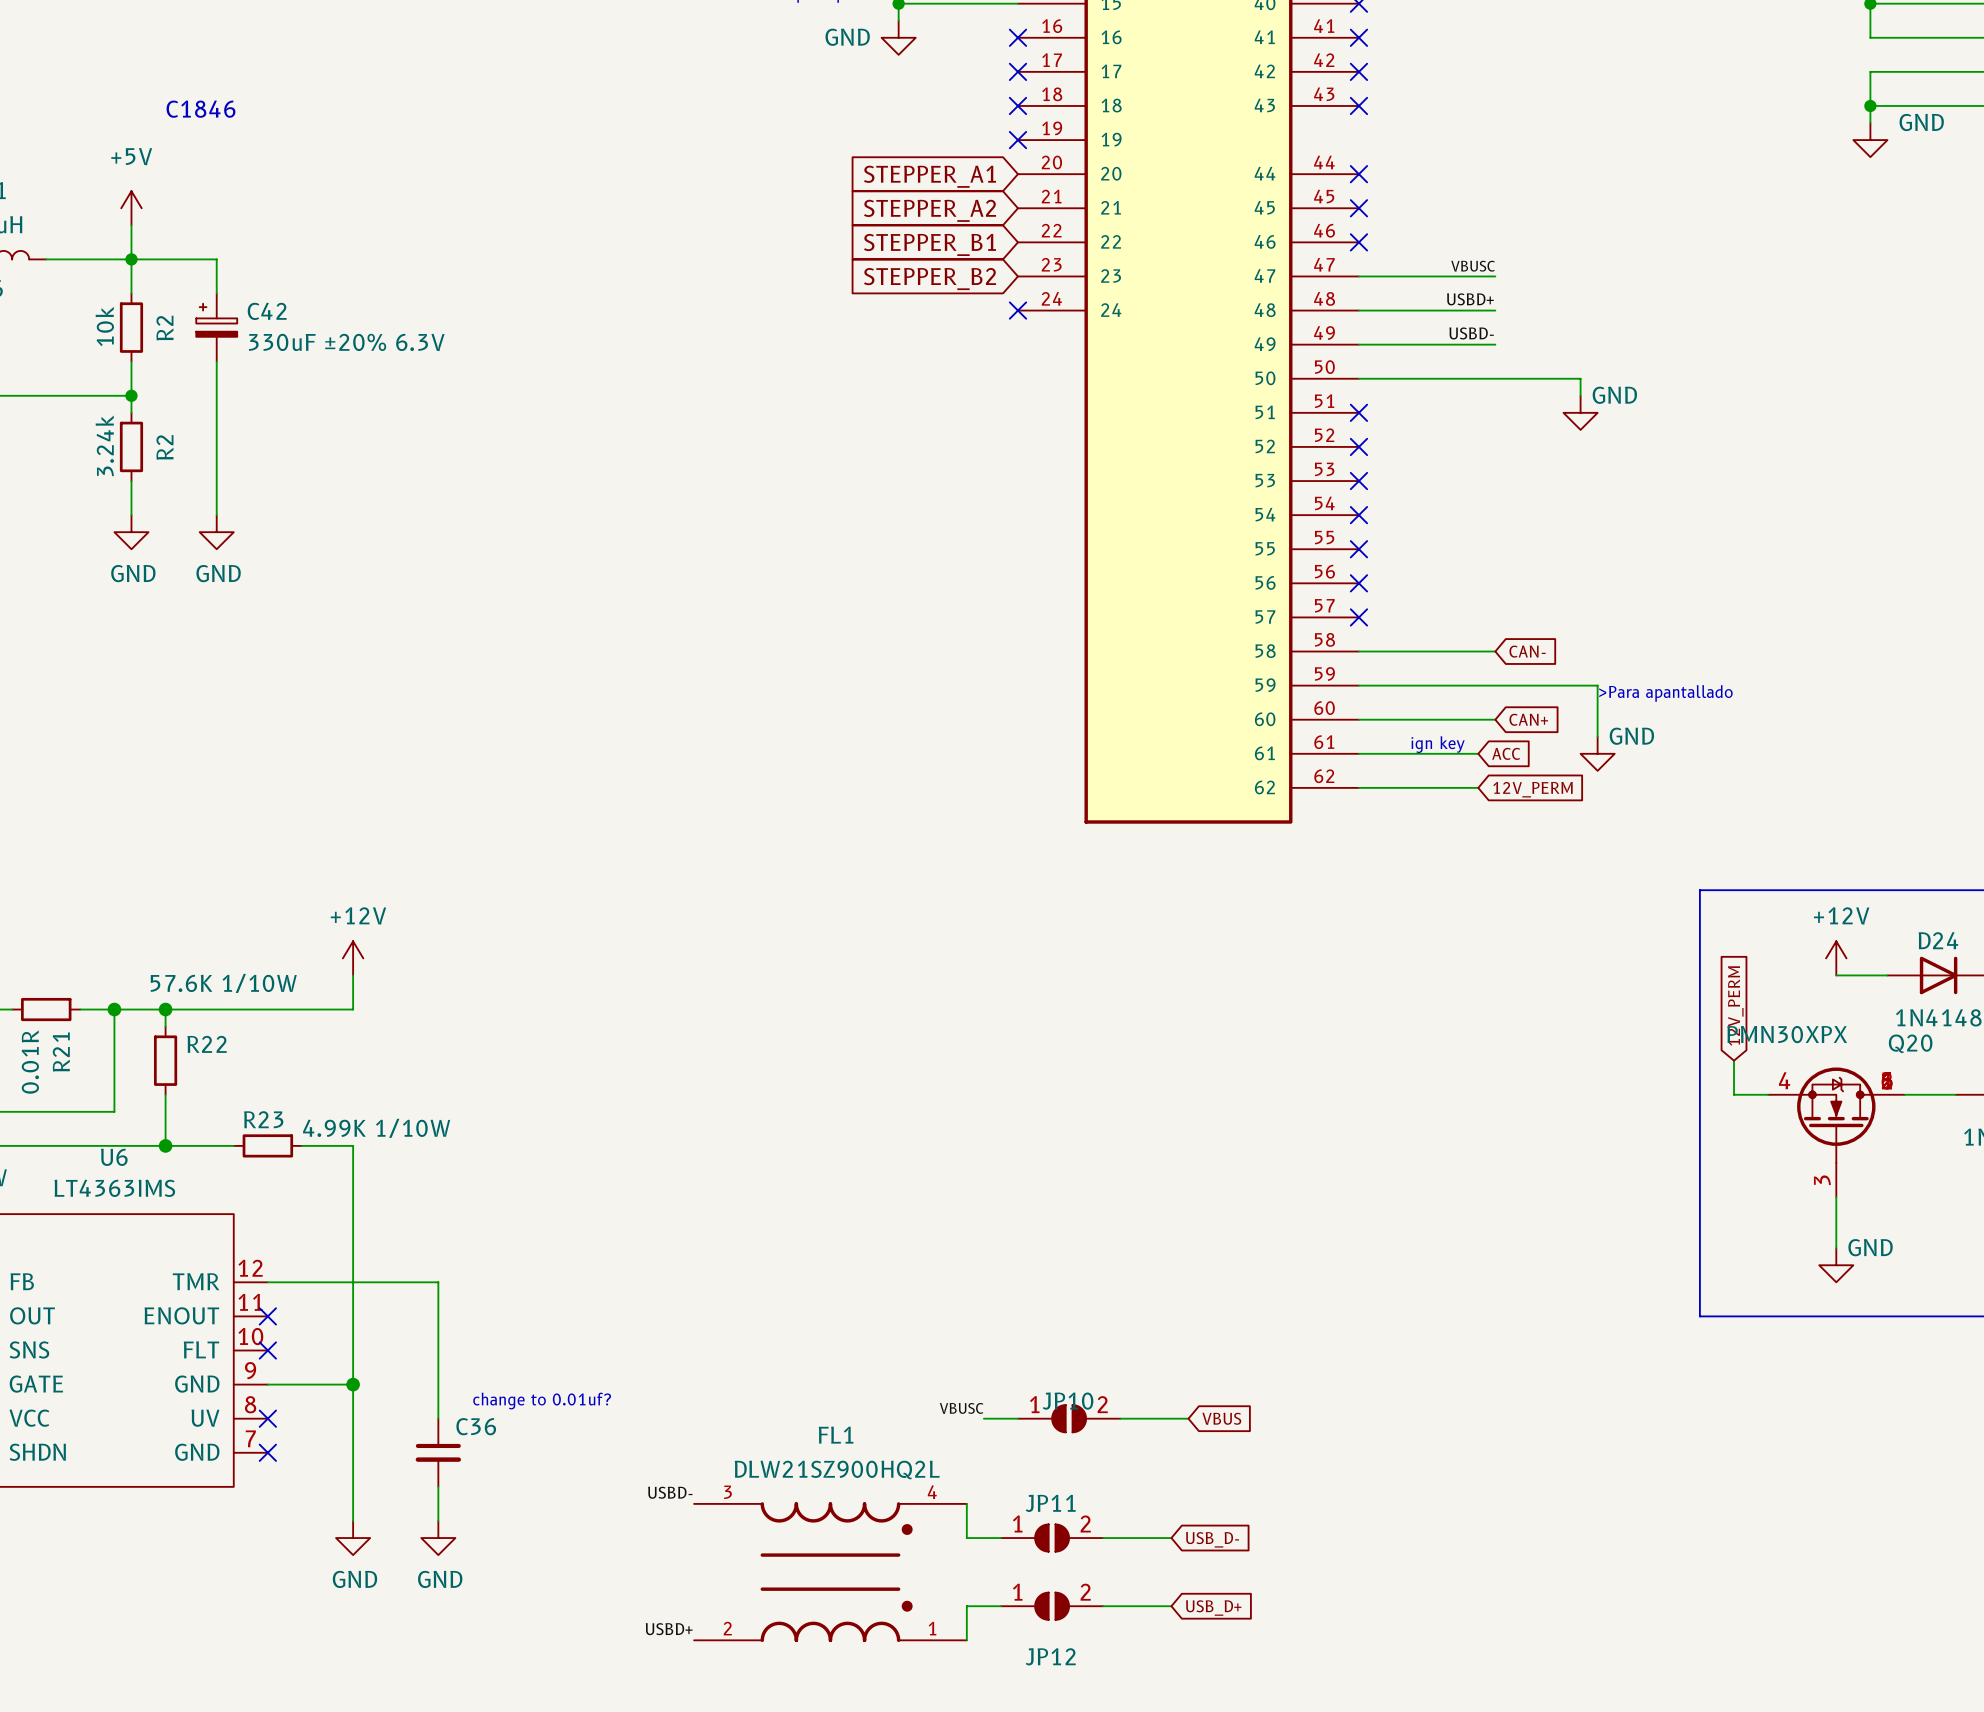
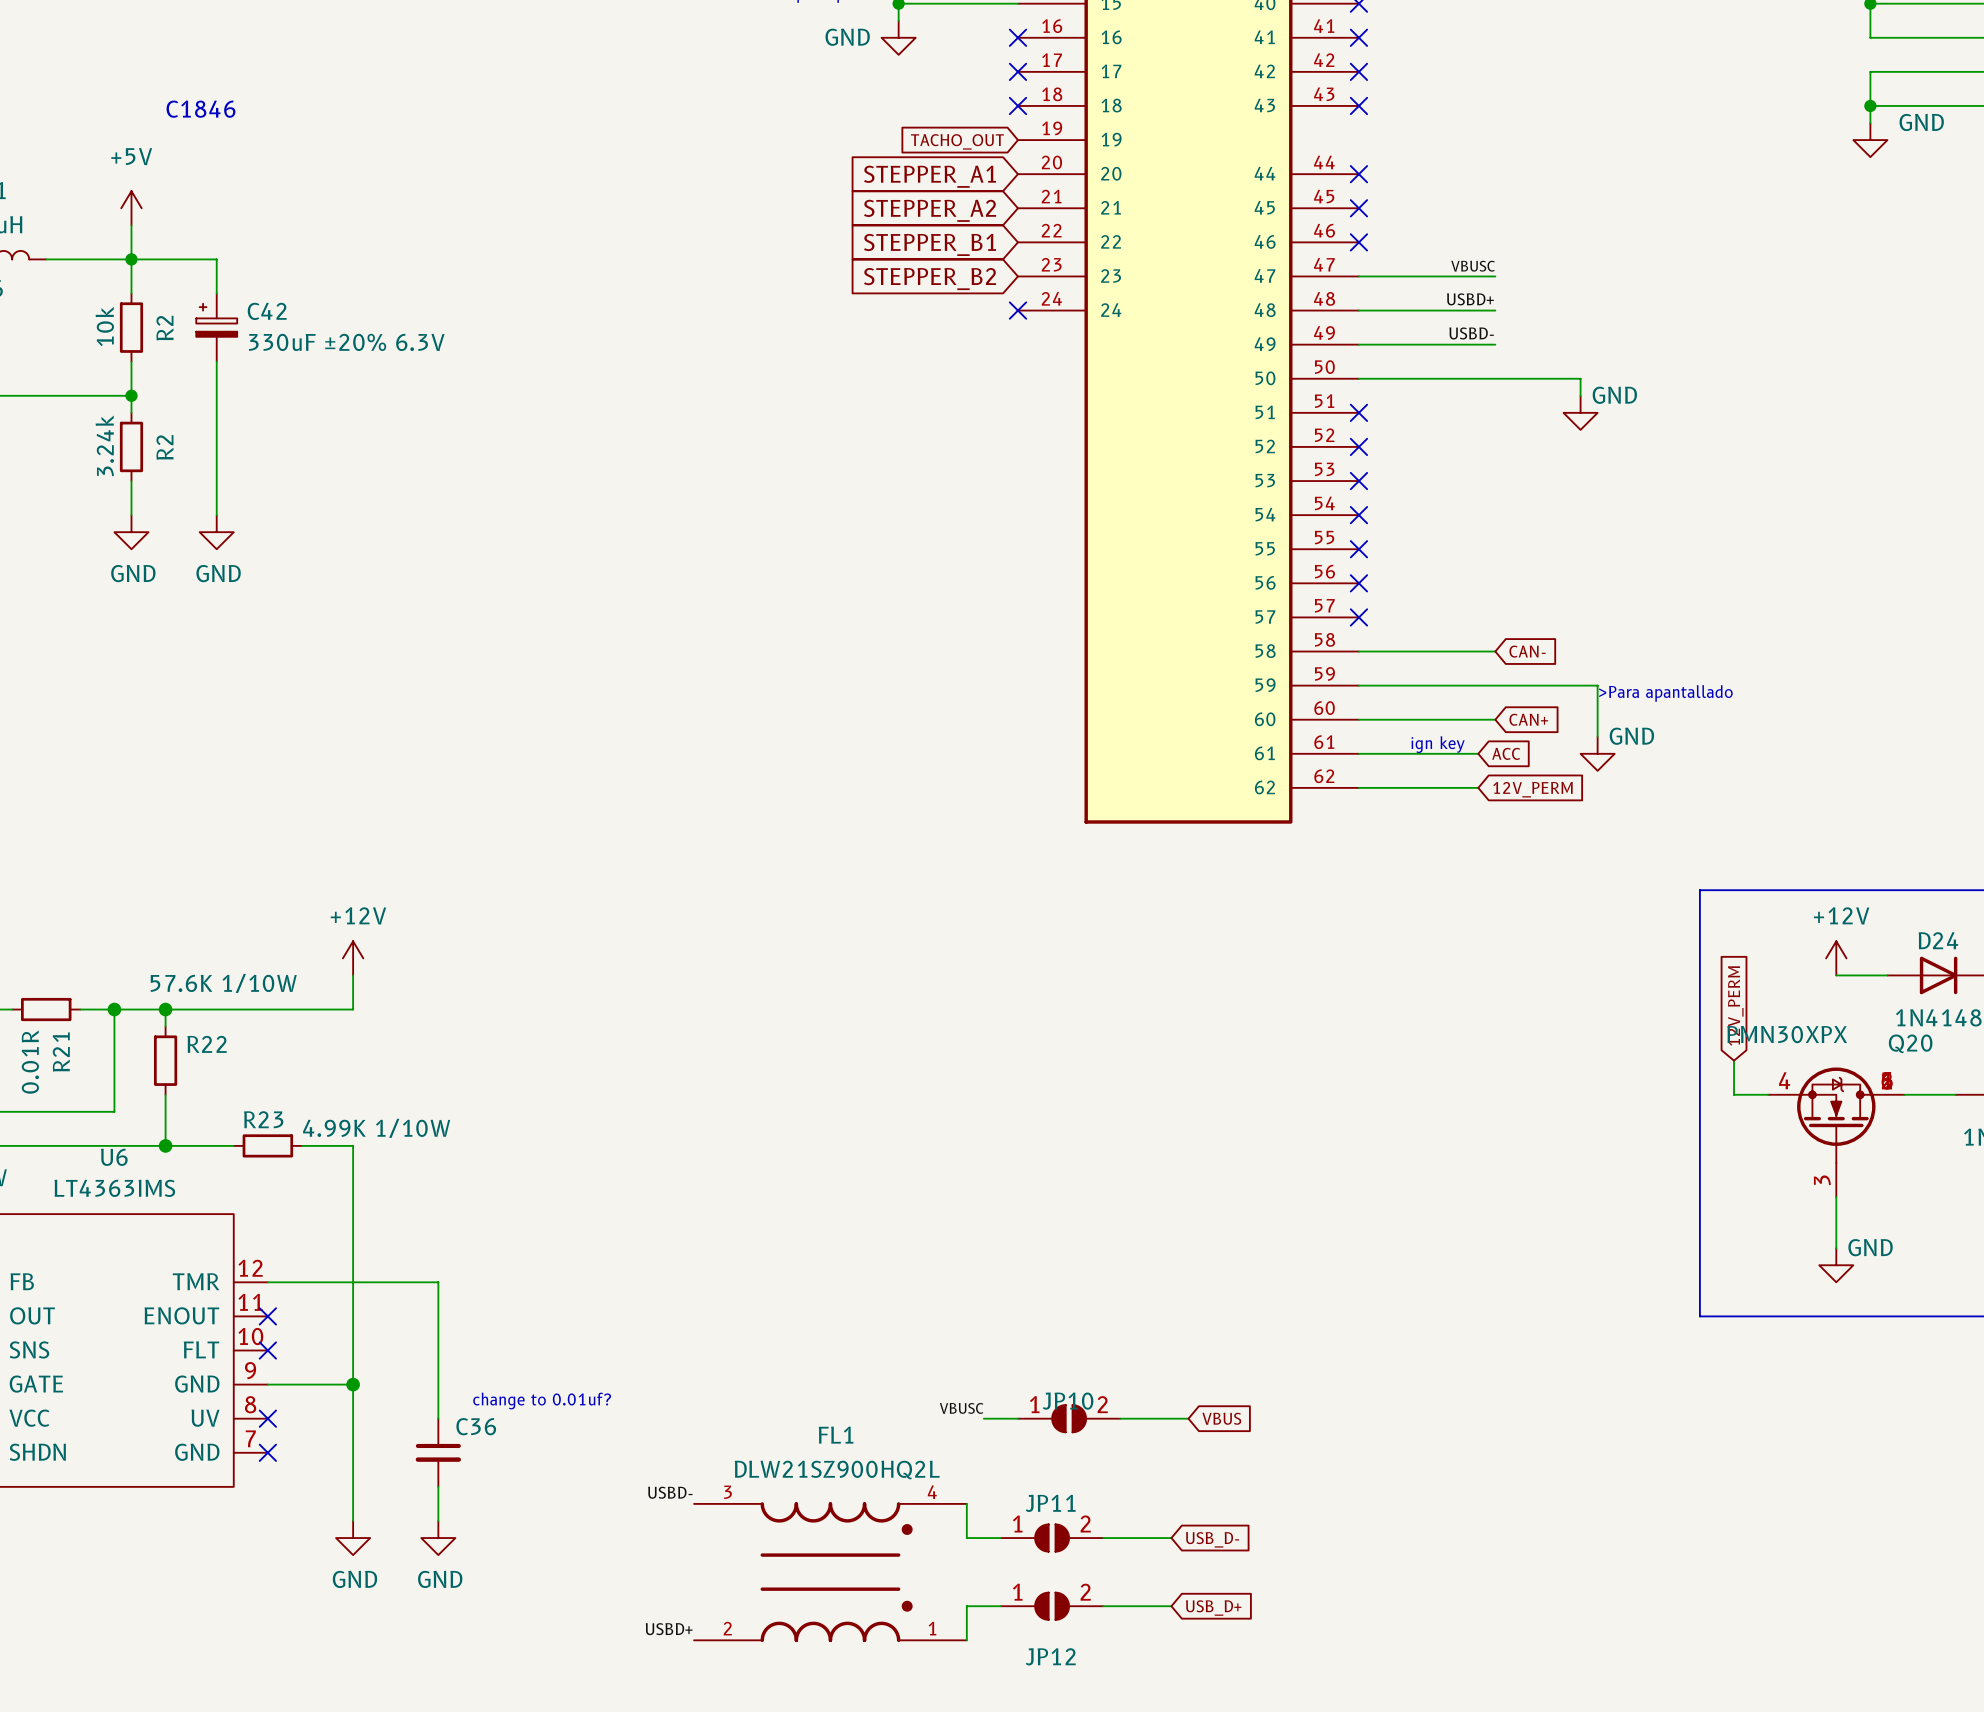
no-connect mark: (1017, 140) -> none
global label: none -> TACHO_OUT (957, 141)

